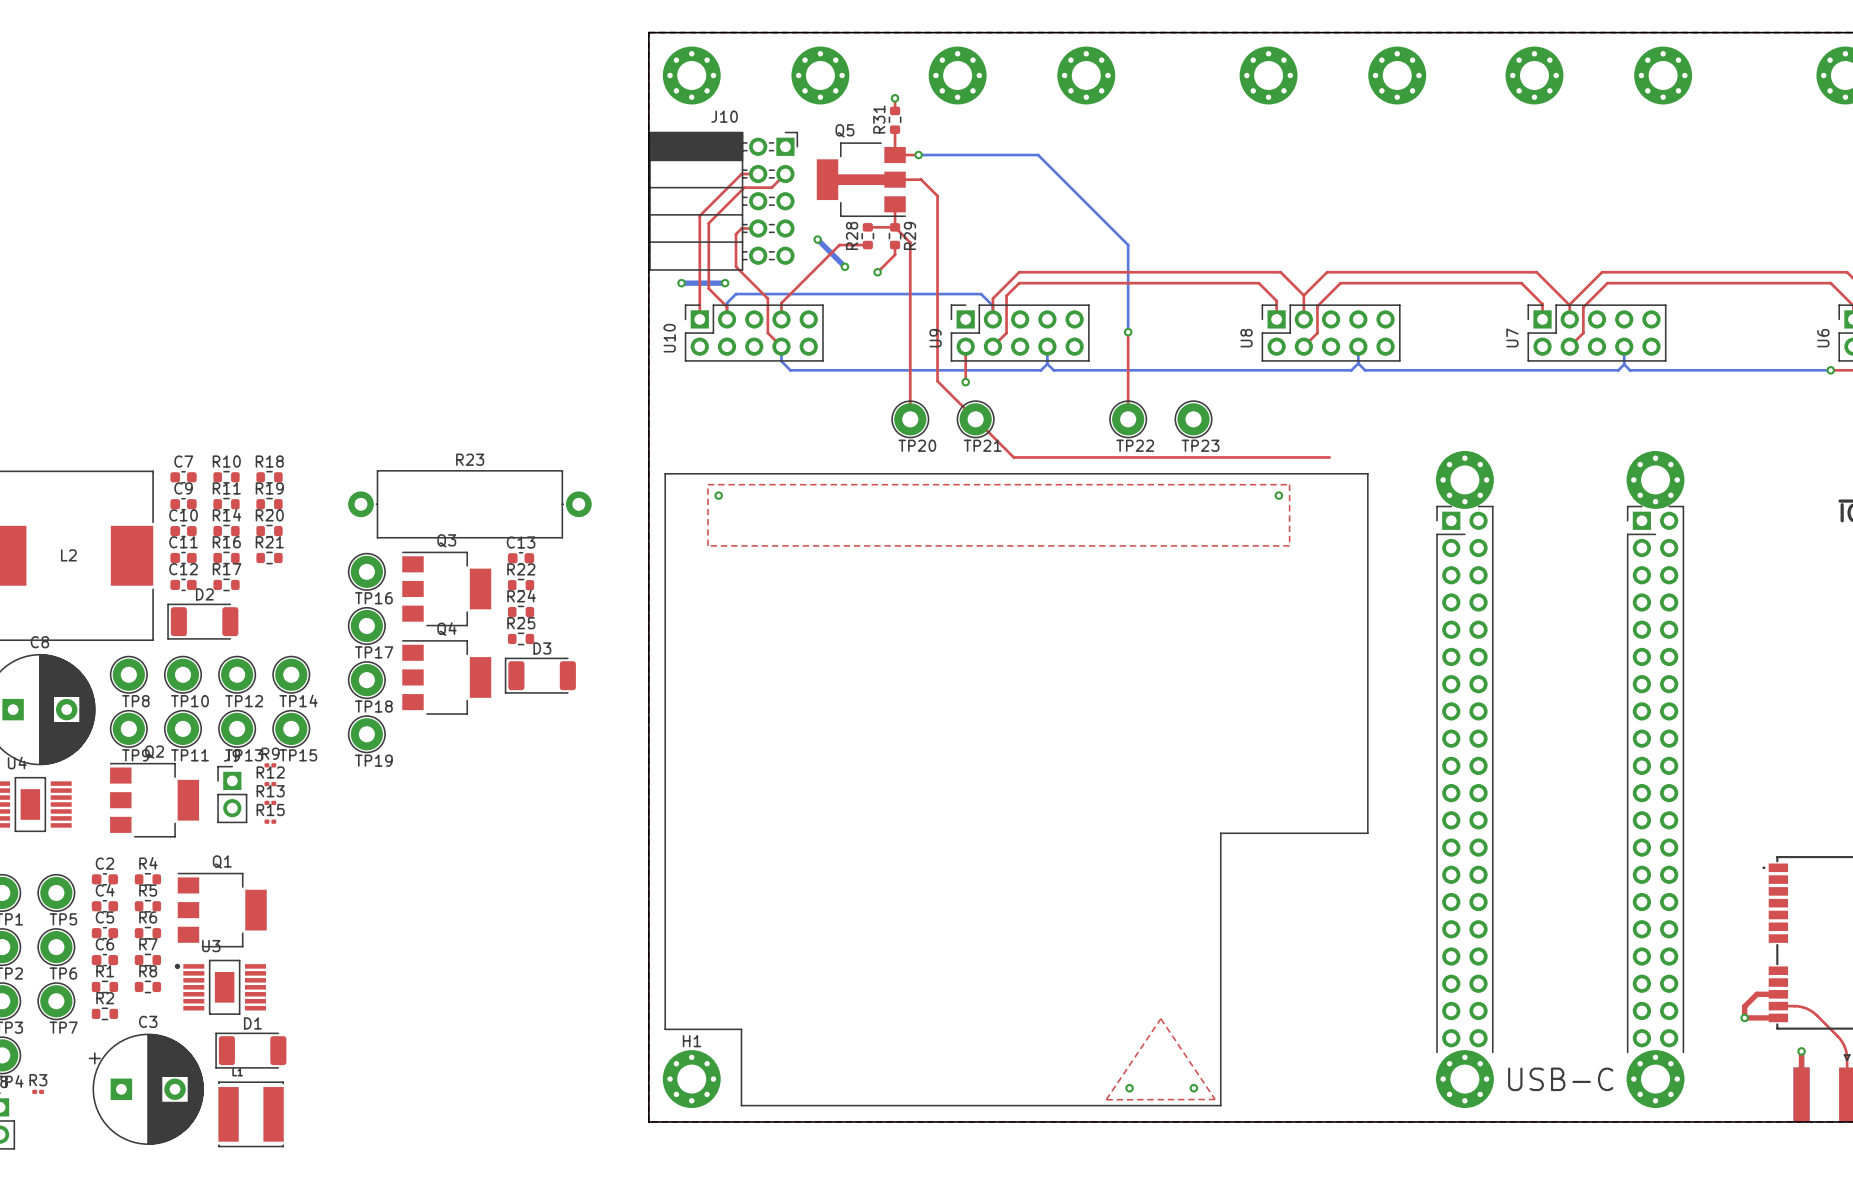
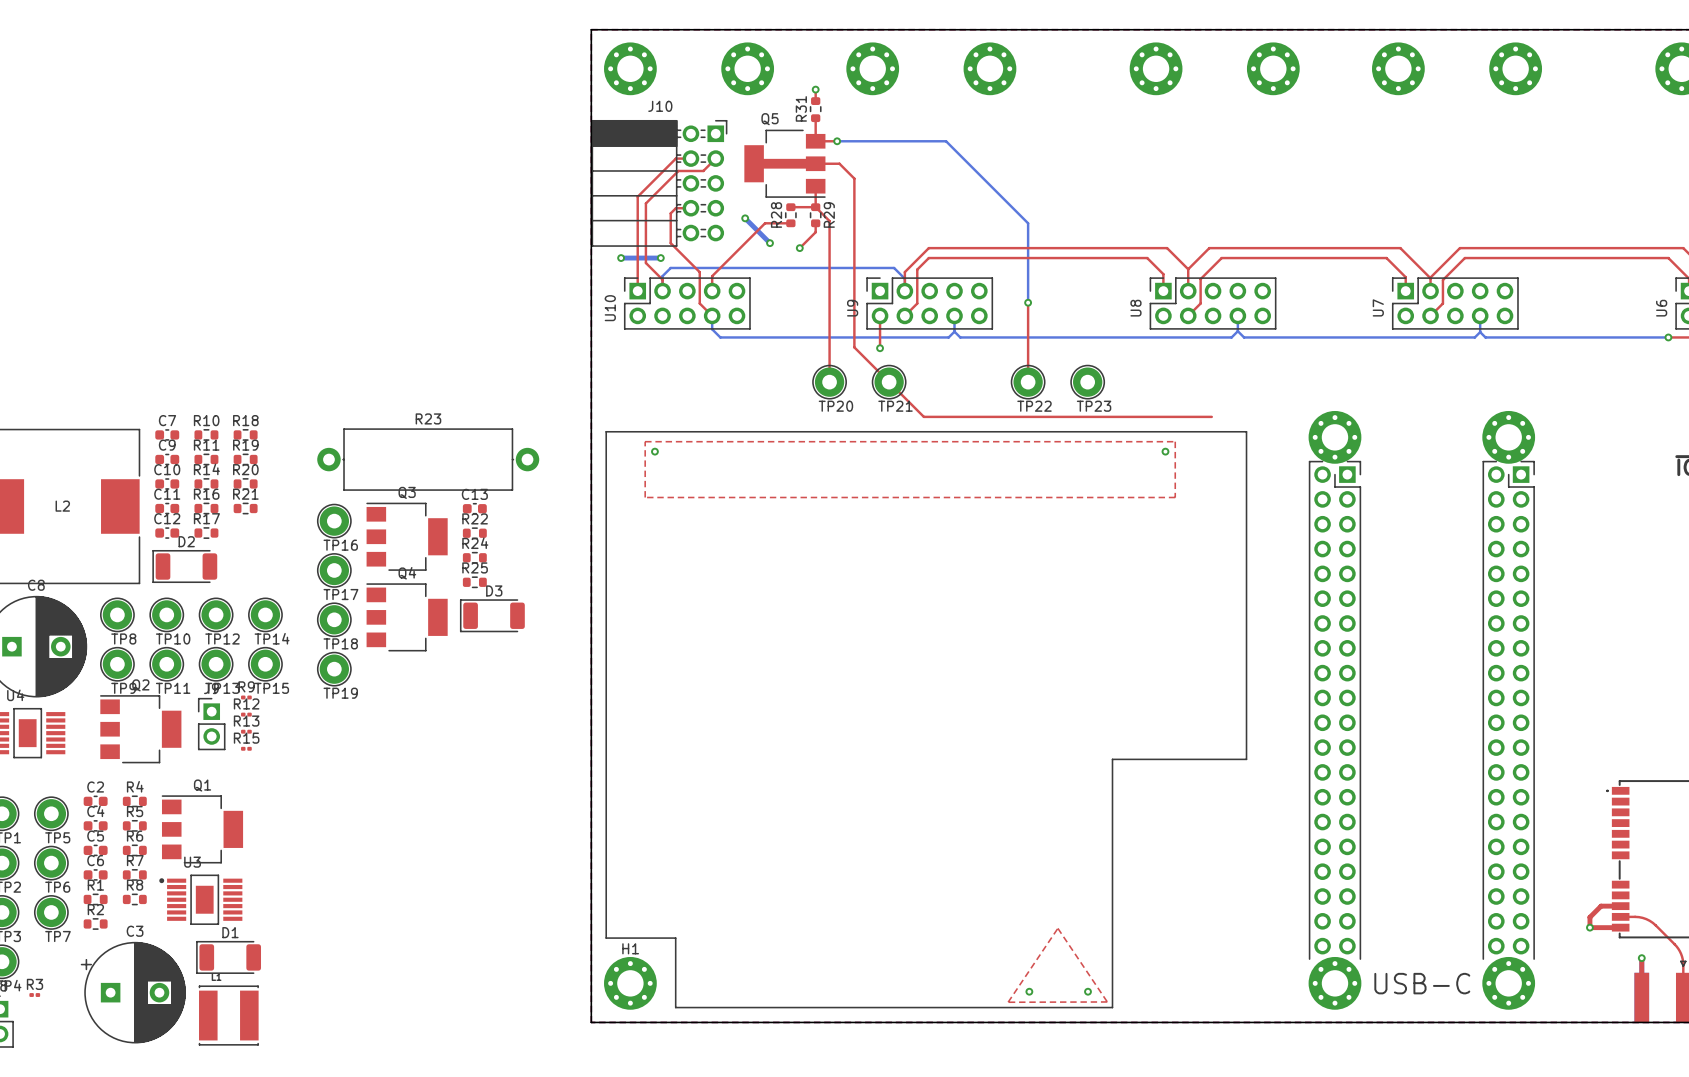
part footprint: [1435, 450, 1685, 1109] -> [1308, 410, 1536, 1010]

